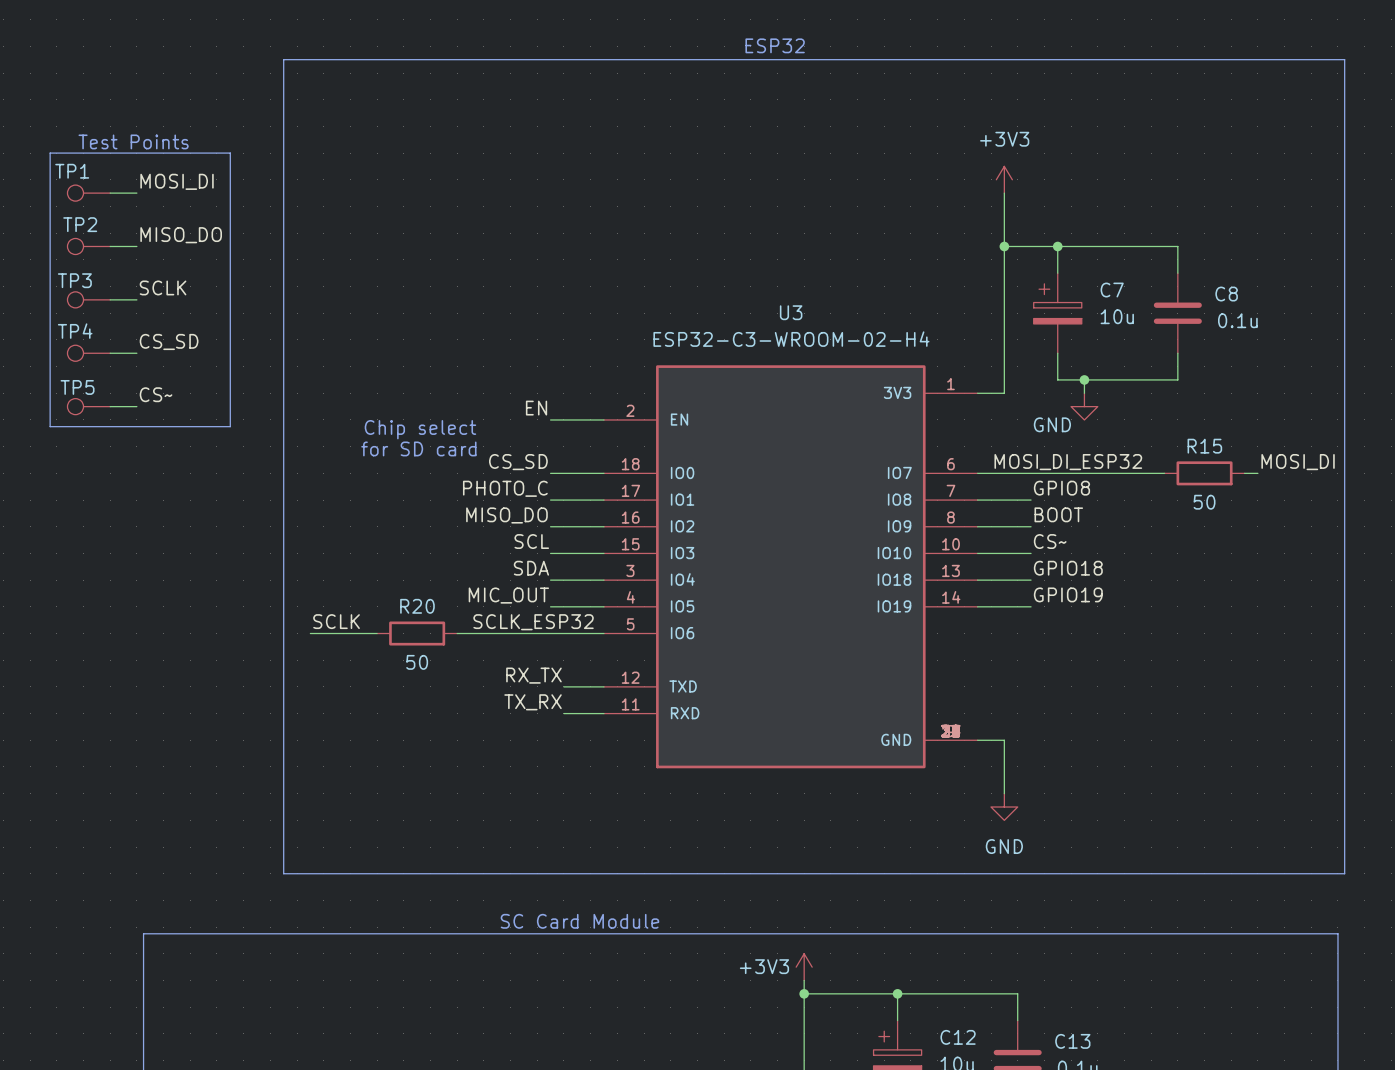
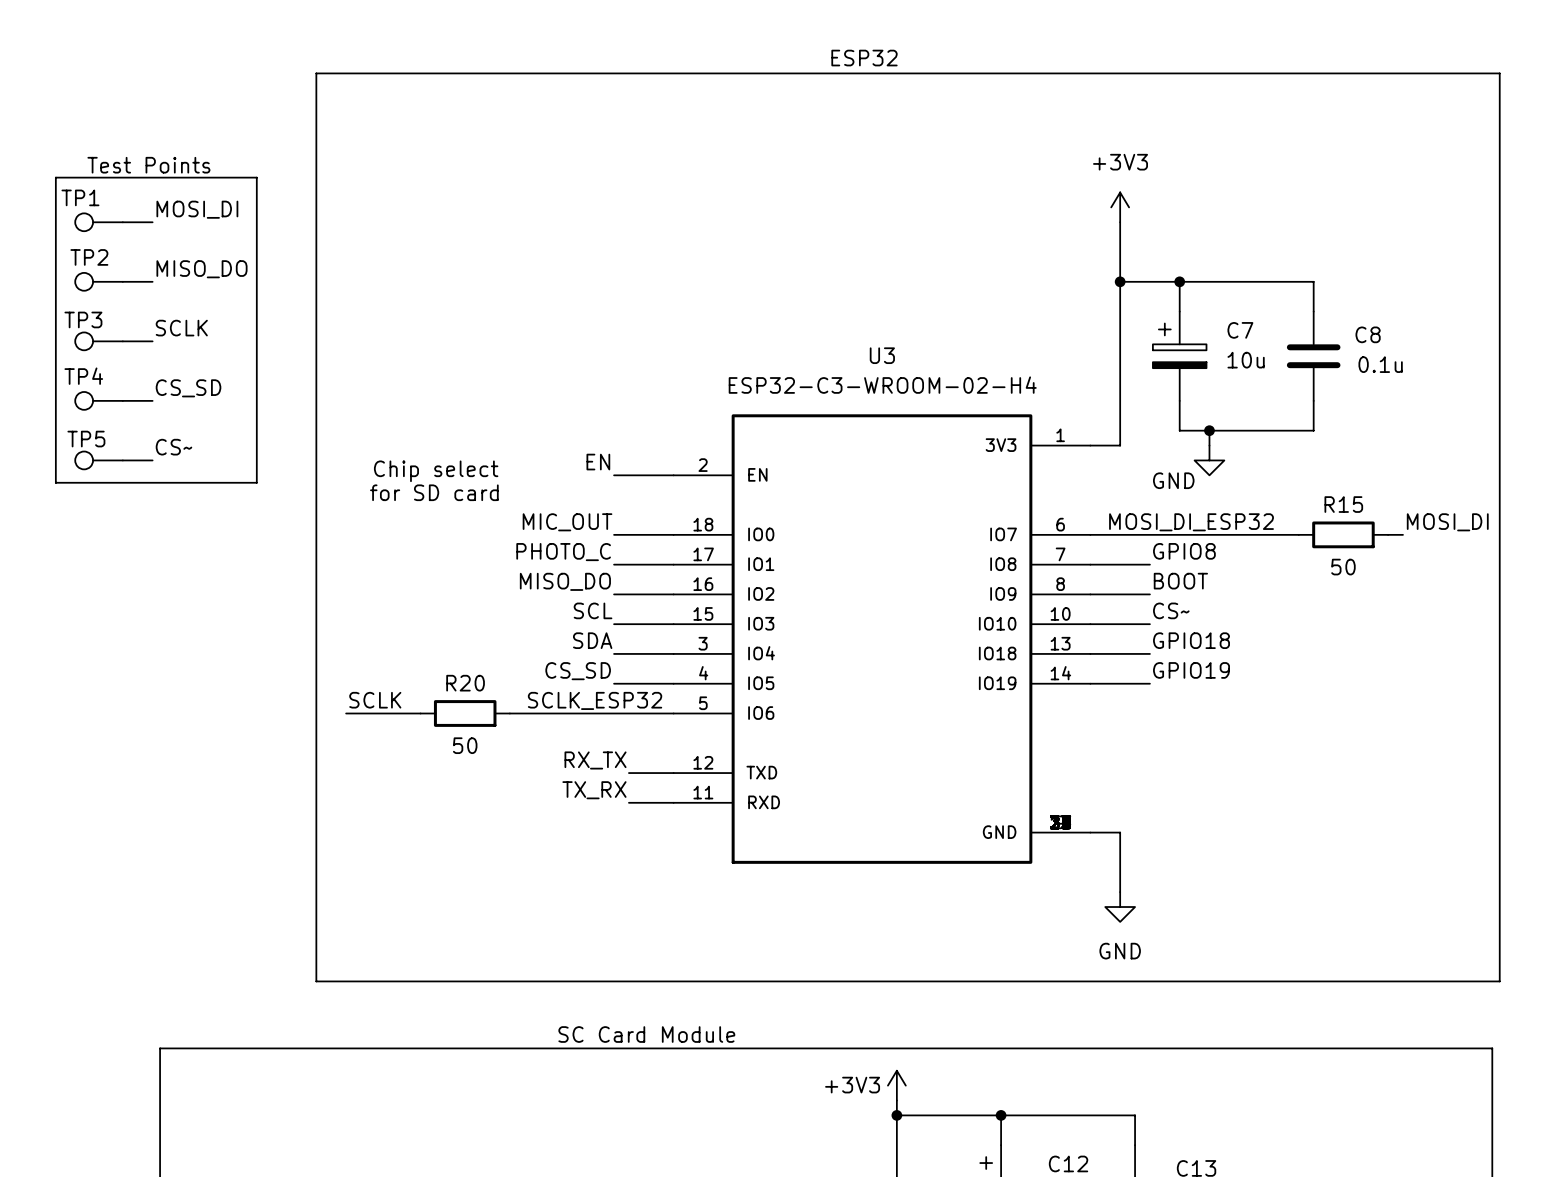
text position: Chip select (420, 429) -> Chip select (436, 471)
text position: for SD card (418, 448) -> for SD card (434, 492)
label: CS_SD (518, 462) -> MIC_OUT (567, 522)
label: MIC_OUT (508, 595) -> CS_SD (578, 671)

